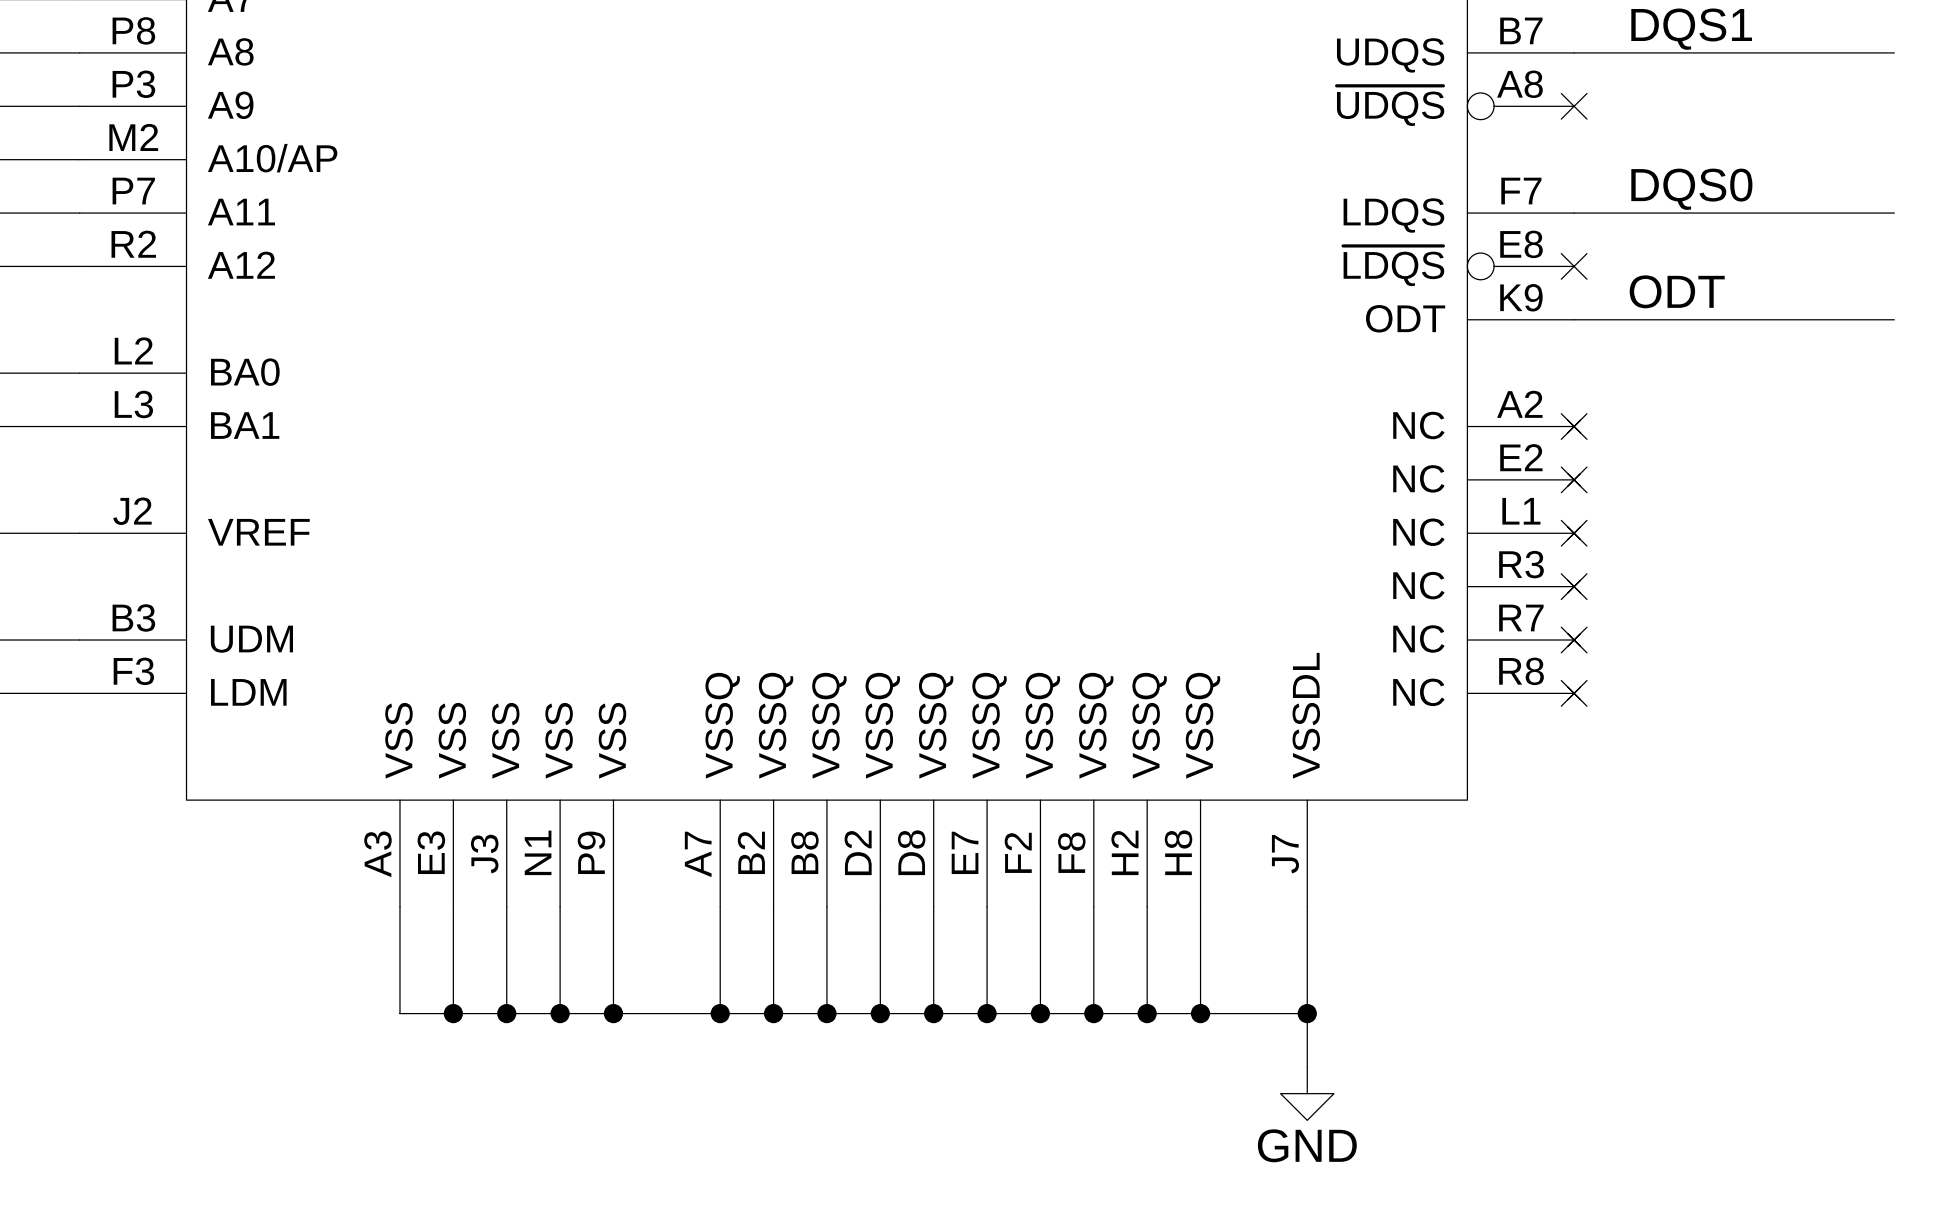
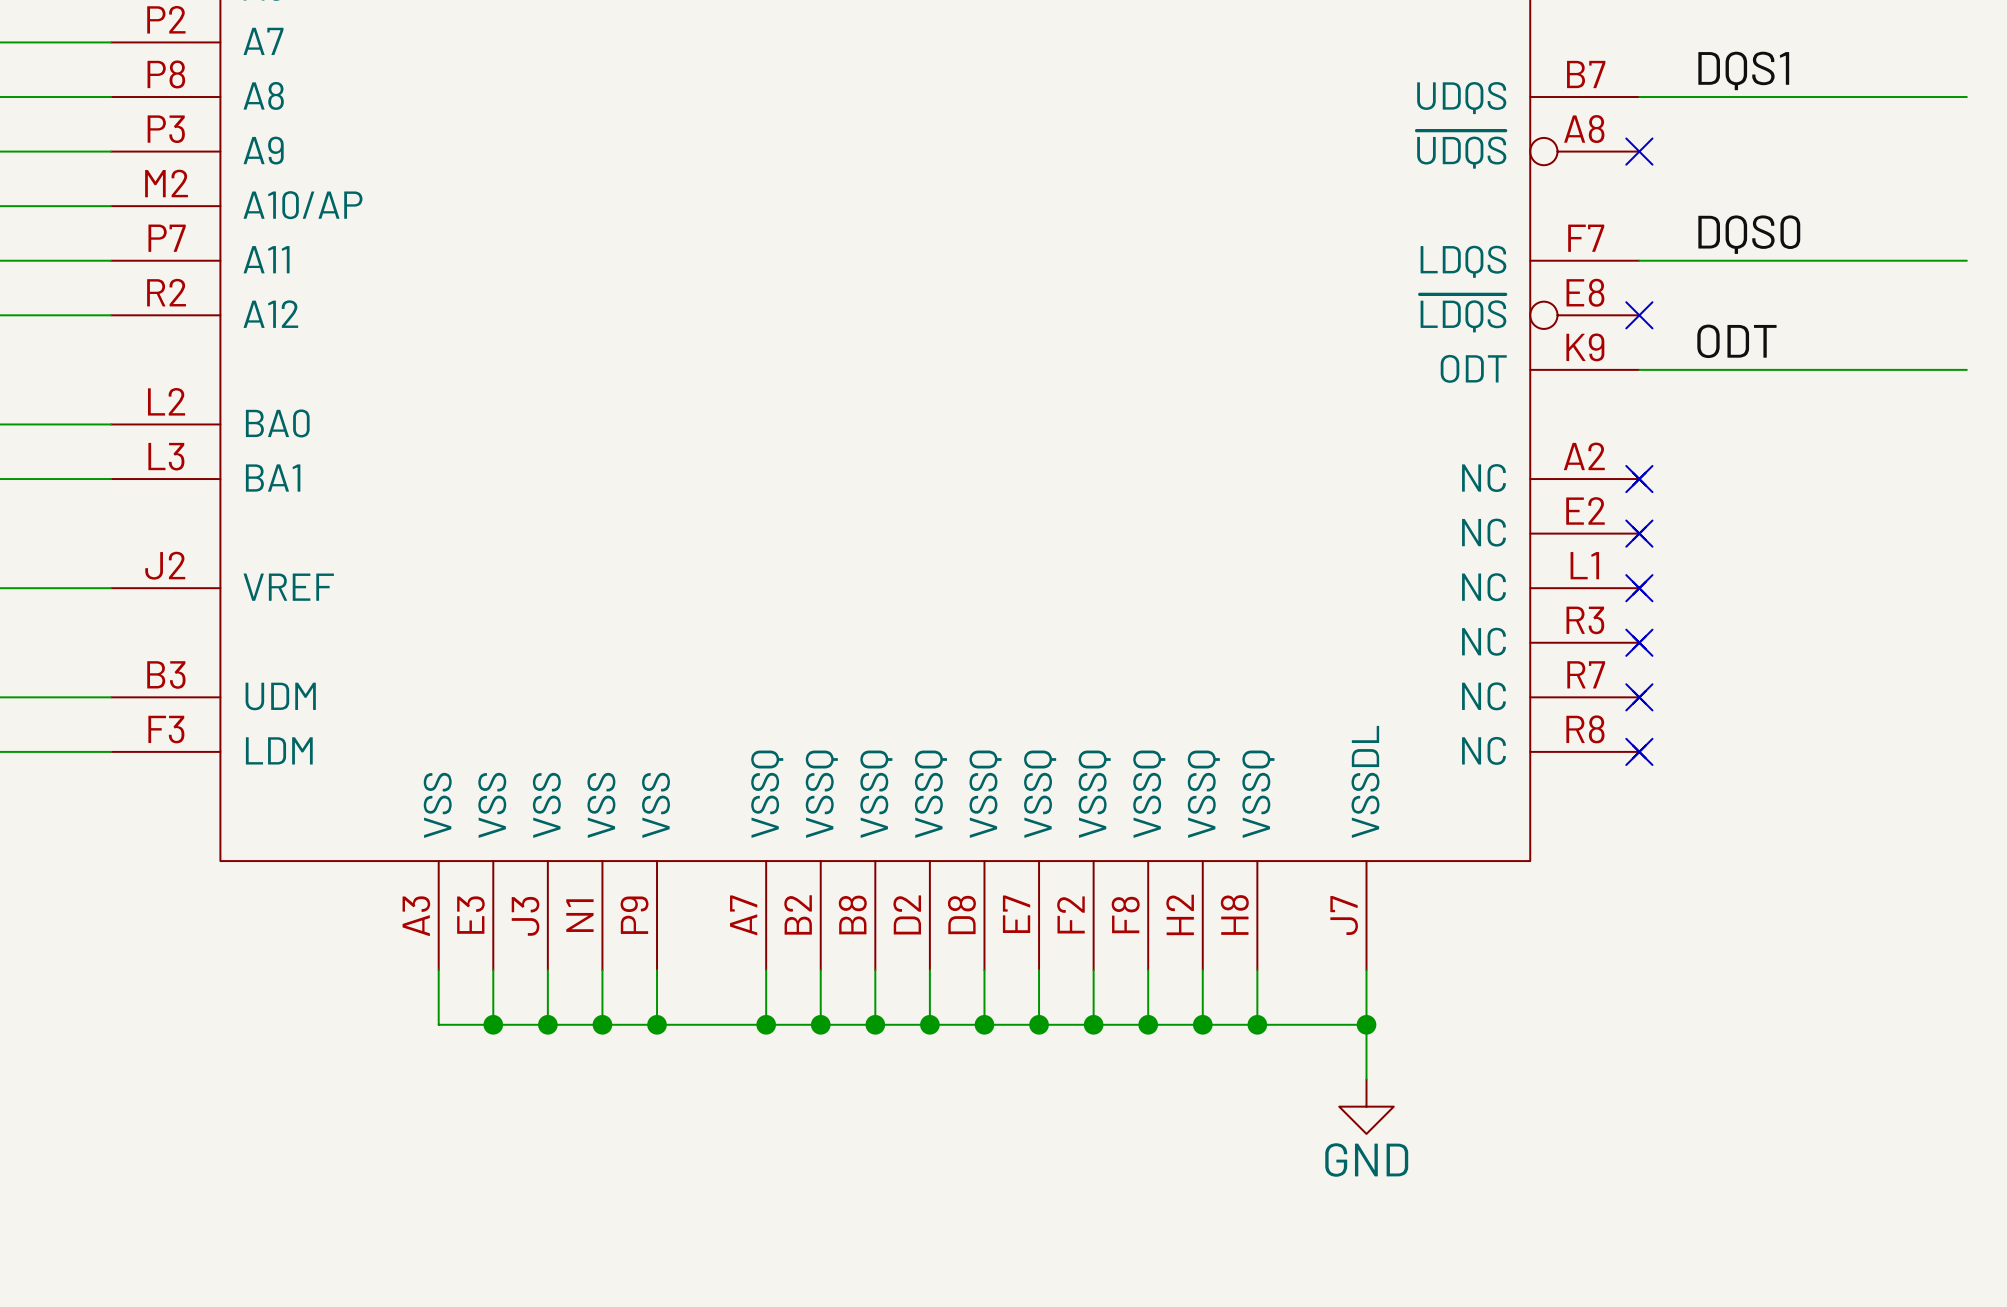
wire: (399, 960) (399, 1013) (1307, 1013) (1307, 1066) -> (438, 1024) (1366, 1024)
wire: (453, 960) (453, 1013) -> none
junction: none -> (493, 1024)
wire: (506, 960) (506, 1013) -> none
junction: none -> (547, 1024)
wire: (560, 960) (560, 1013) -> none
junction: none -> (602, 1024)
wire: (613, 960) (613, 1013) -> none
junction: none -> (657, 1024)
wire: (720, 960) (720, 1013) -> none
junction: none -> (766, 1024)
wire: (773, 960) (773, 1013) -> none
junction: none -> (820, 1024)
wire: (826, 960) (826, 1013) -> none
junction: none -> (875, 1024)
wire: (880, 960) (880, 1013) -> none
junction: none -> (929, 1024)
wire: (933, 960) (933, 1013) -> none
junction: none -> (984, 1024)
wire: (987, 960) (987, 1013) -> none
junction: none -> (1039, 1024)
wire: (1040, 960) (1040, 1013) -> none
junction: none -> (1093, 1024)
wire: (1093, 960) (1093, 1013) -> none
junction: none -> (1148, 1024)
wire: (1147, 960) (1147, 1013) -> none
junction: none -> (1202, 1024)
wire: (1200, 960) (1200, 1013) -> none
junction: none -> (1257, 1024)
junction: (453, 1013) -> none
junction: (506, 1013) -> none
junction: (560, 1013) -> none
junction: (613, 1013) -> none
junction: (720, 1013) -> none
junction: (773, 1013) -> none
junction: (826, 1013) -> none
junction: (880, 1013) -> none
junction: (933, 1013) -> none
junction: (987, 1013) -> none
junction: (1040, 1013) -> none
junction: (1093, 1013) -> none
junction: (1147, 1013) -> none
junction: (1200, 1013) -> none
junction position: (1307, 1013) -> (1366, 1024)
power symbol position: GND (1307, 1093) -> GND (1366, 1106)

